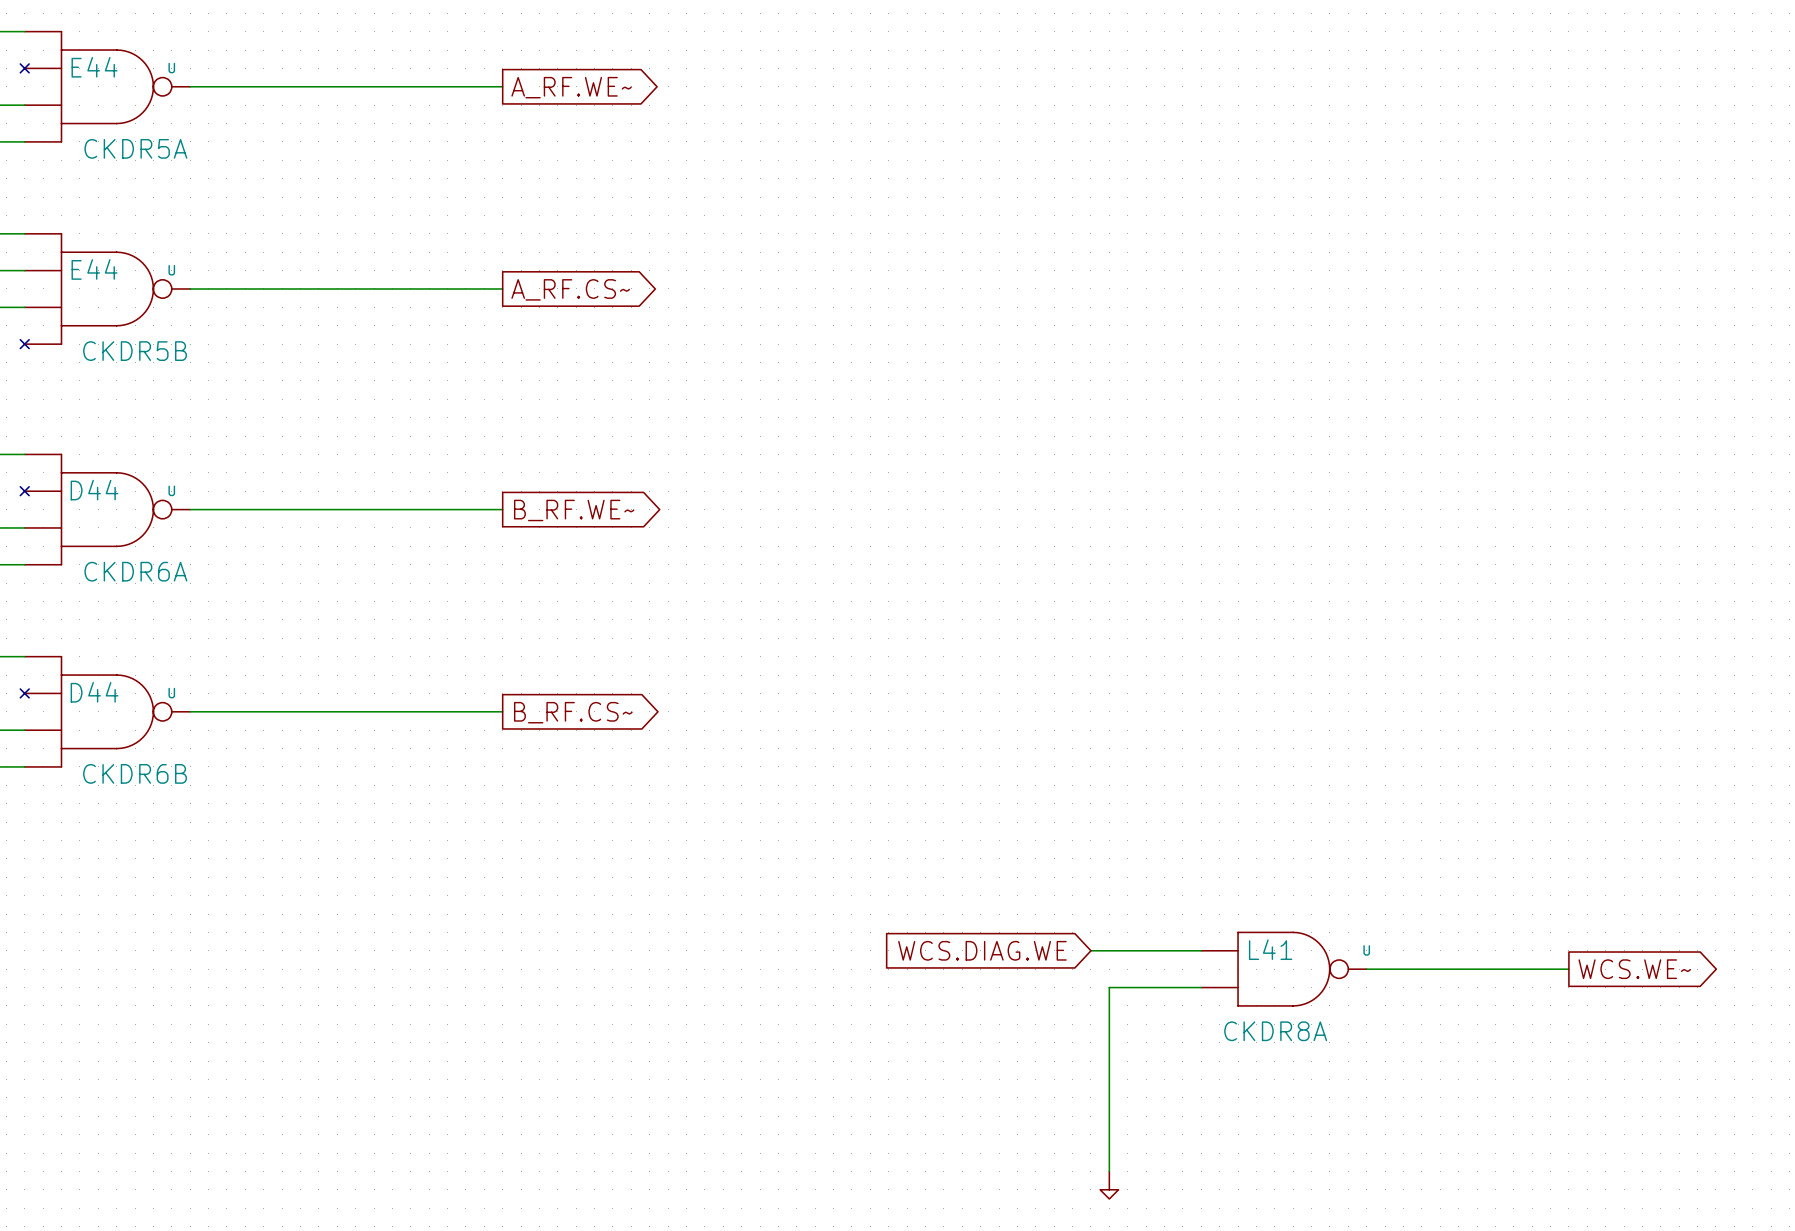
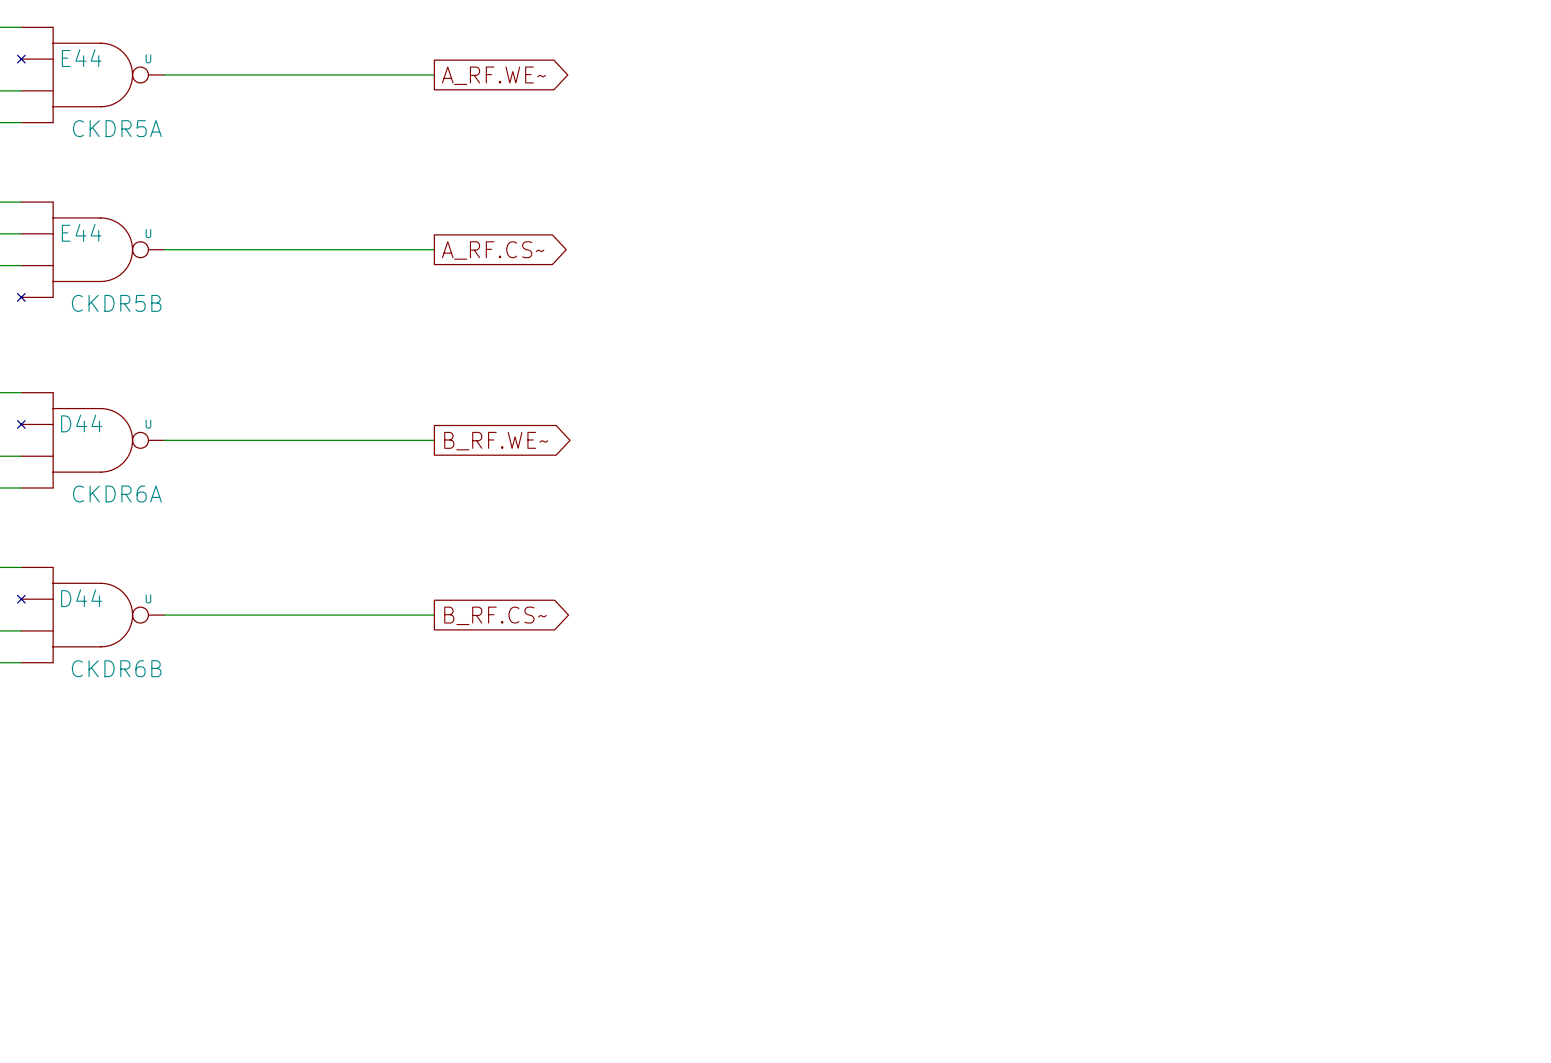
global label: WCS.DIAG.WE (982, 950) -> none
wire: (1090, 950) (1201, 950) -> none
U: (1283, 969) -> none
wire: (1366, 969) (1568, 969) -> none
global label: WCS.WE~ (1634, 969) -> none
wire: (1201, 987) (1109, 987) (1109, 1171) -> none
power symbol: (1109, 1185) -> none

